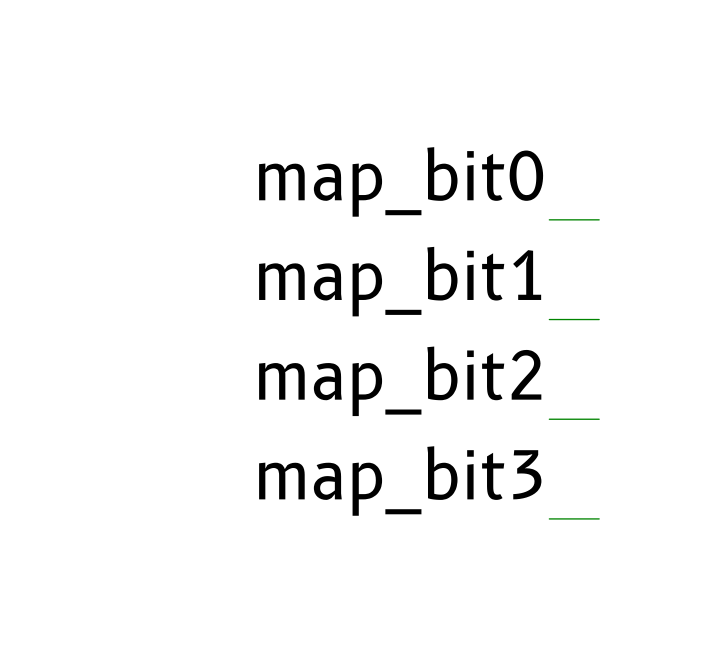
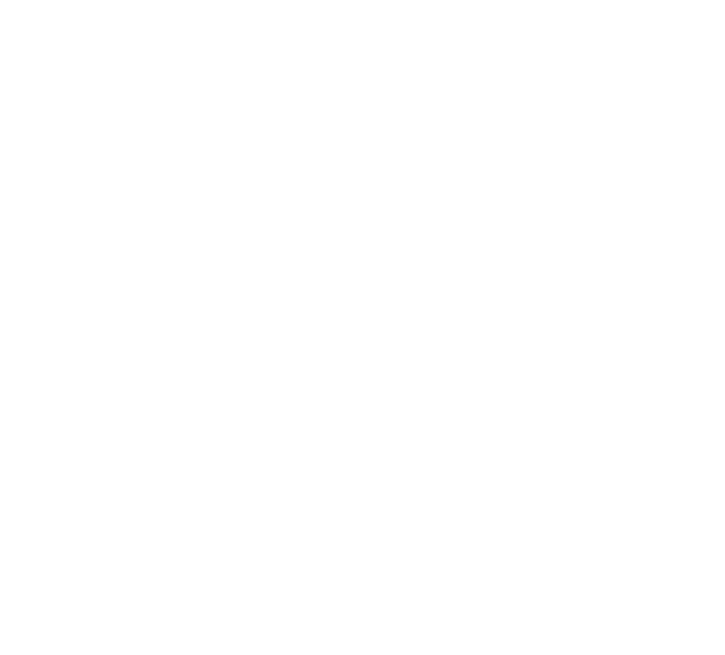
label: map_bit0 (401, 181) -> none
wire: (549, 219) (599, 219) -> none
label: map_bit1 (400, 281) -> none
wire: (549, 319) (599, 319) -> none
label: map_bit2 (400, 381) -> none
wire: (549, 419) (599, 419) -> none
label: map_bit3 (400, 481) -> none
wire: (549, 518) (599, 518) -> none

